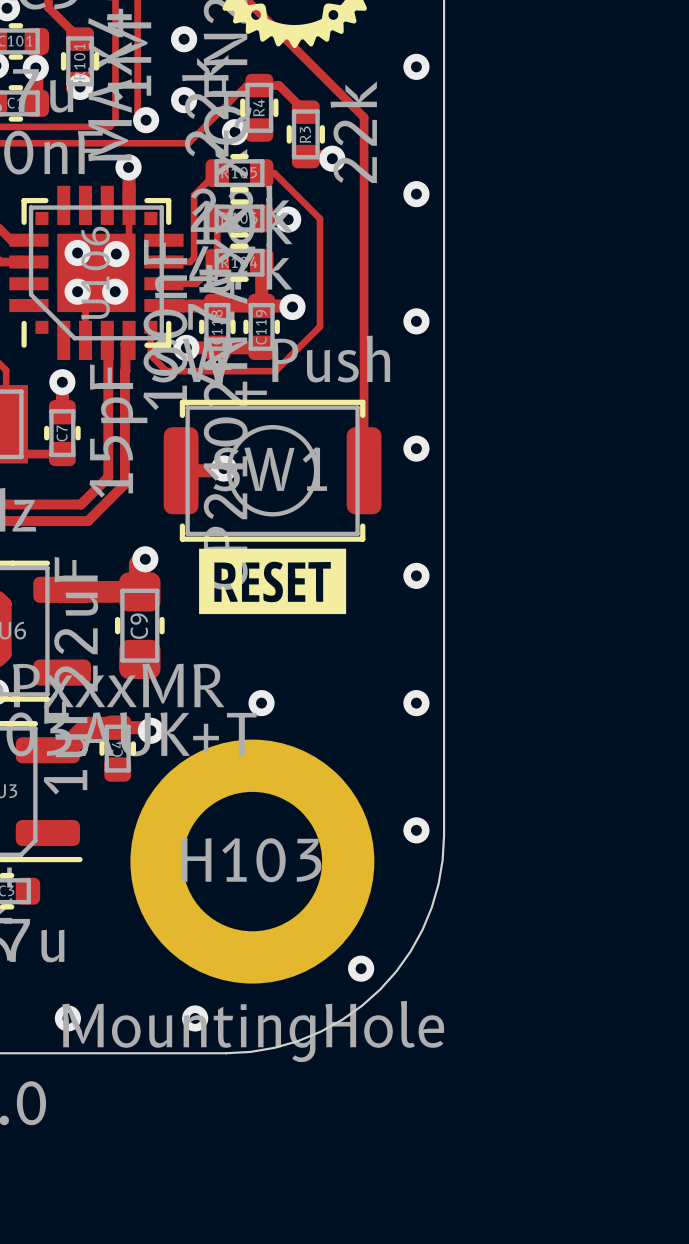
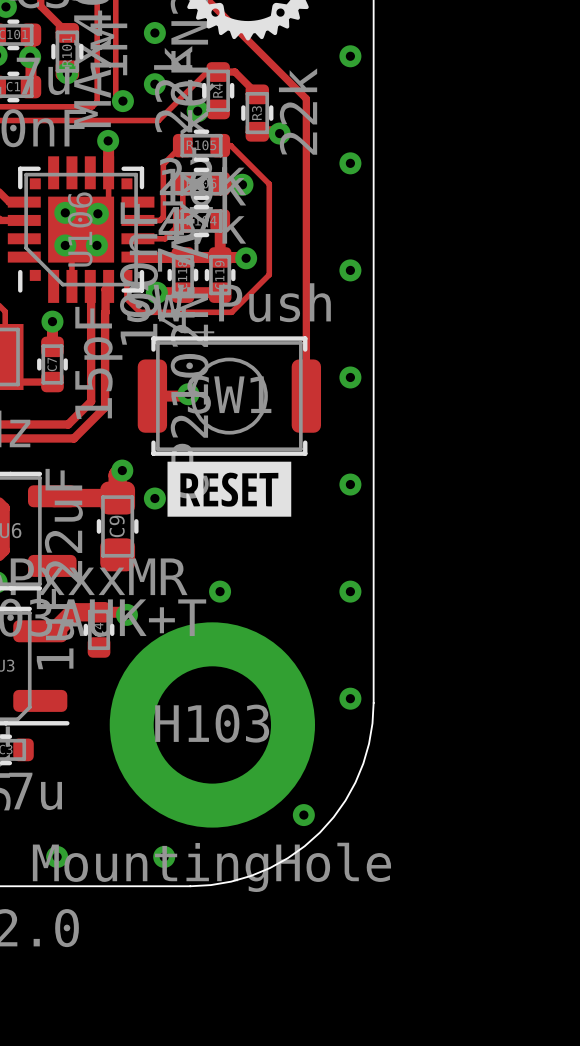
via: none -> (154, 498)

